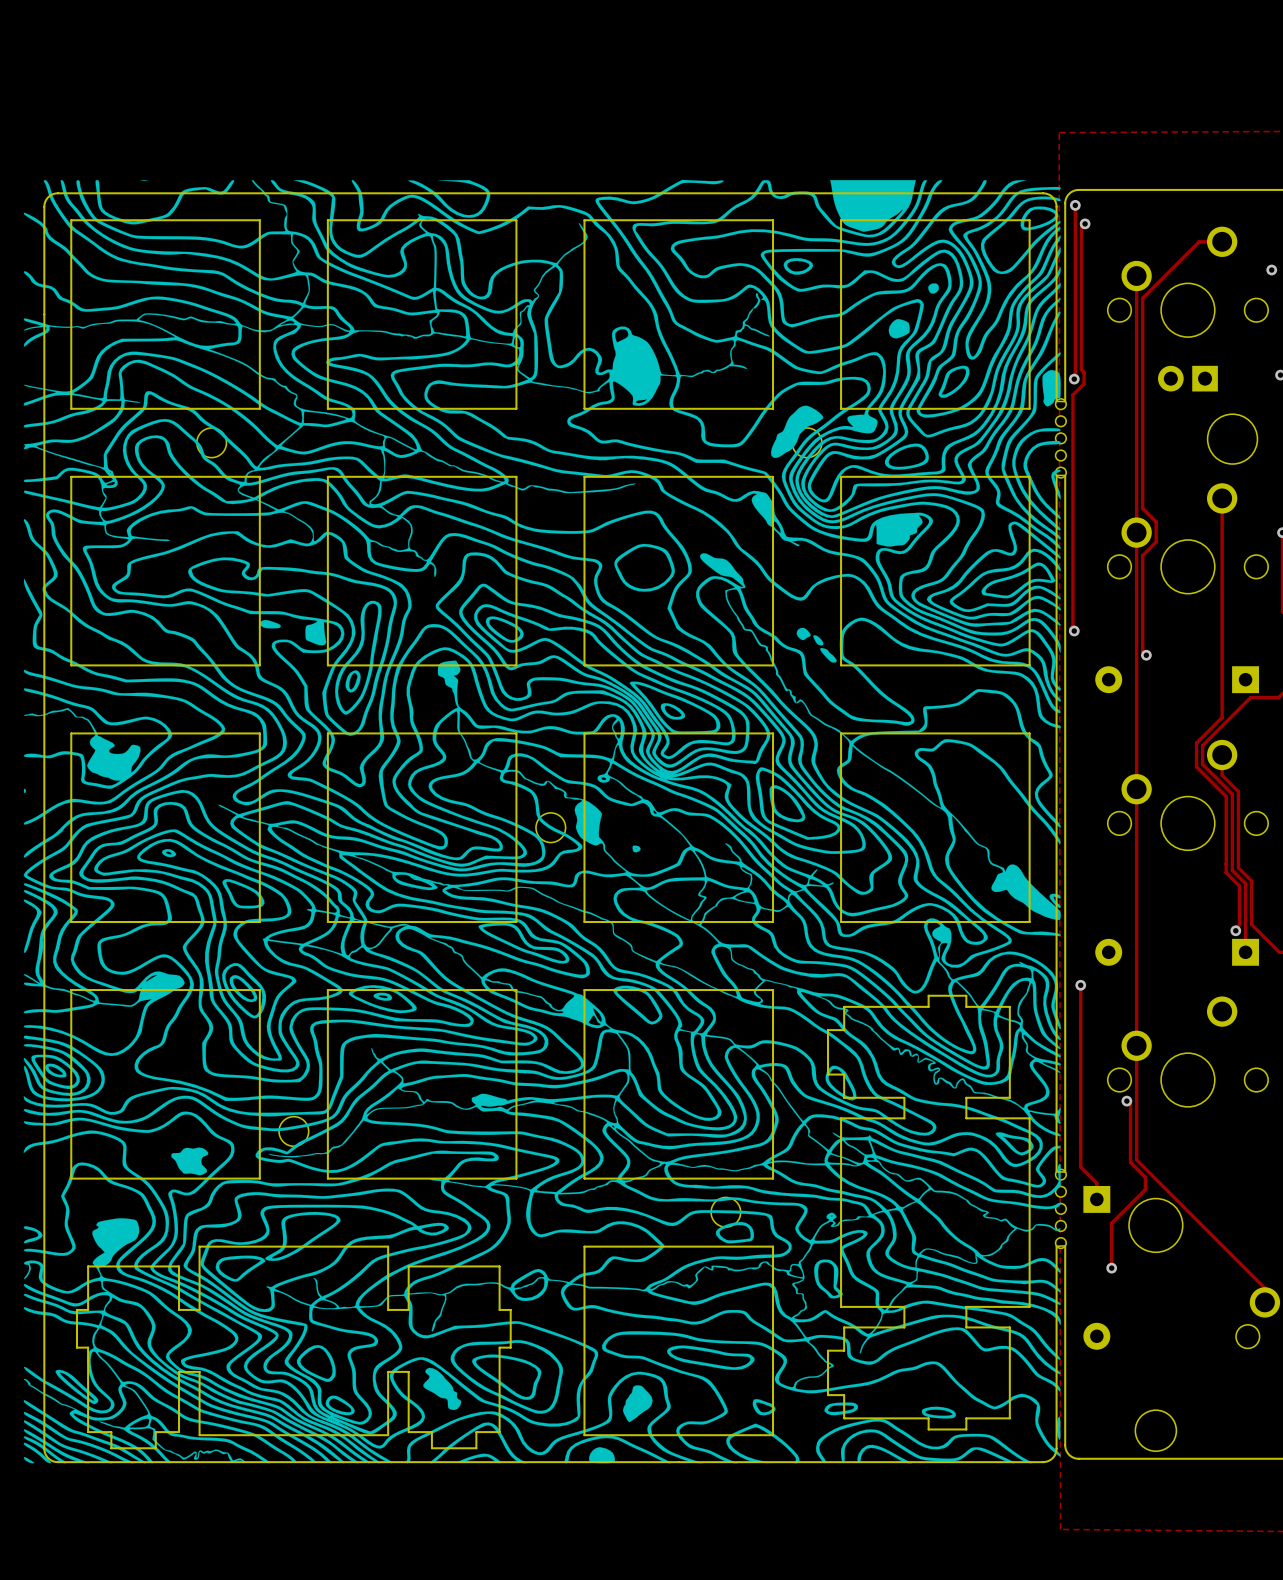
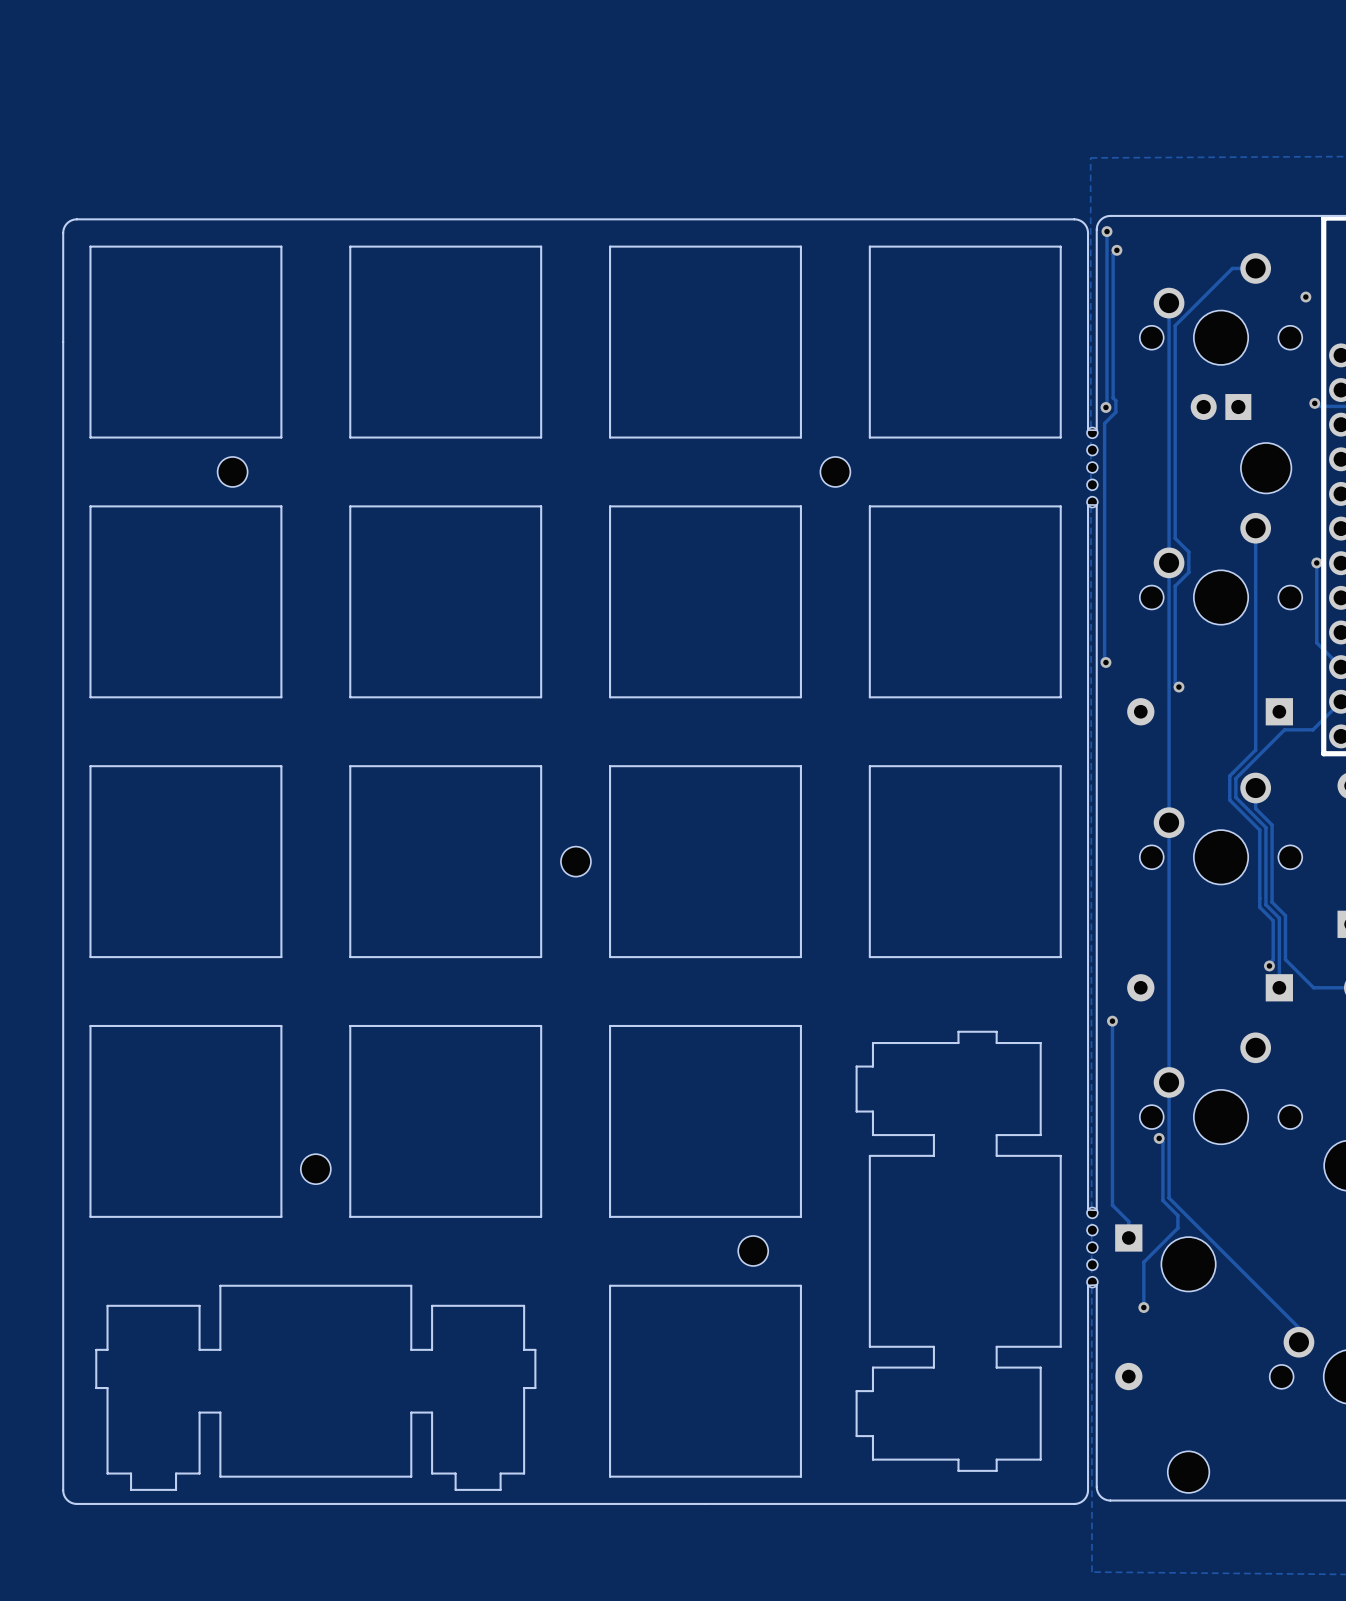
drawing: [23, 179, 1061, 1464] -> none

